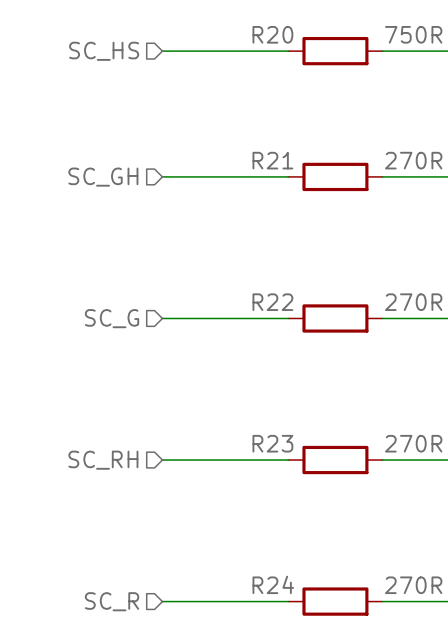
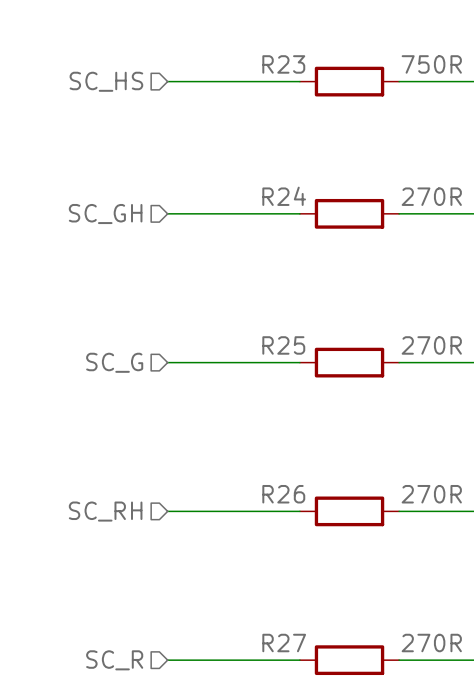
R20 name: R20 (272, 34) -> R23 (283, 64)
R21 name: R21 (272, 160) -> R24 (284, 196)
R22 name: R22 (272, 302) -> R25 (283, 345)
R23 name: R23 (272, 443) -> R26 (283, 494)
R24 name: R24 (273, 584) -> R27 (284, 643)

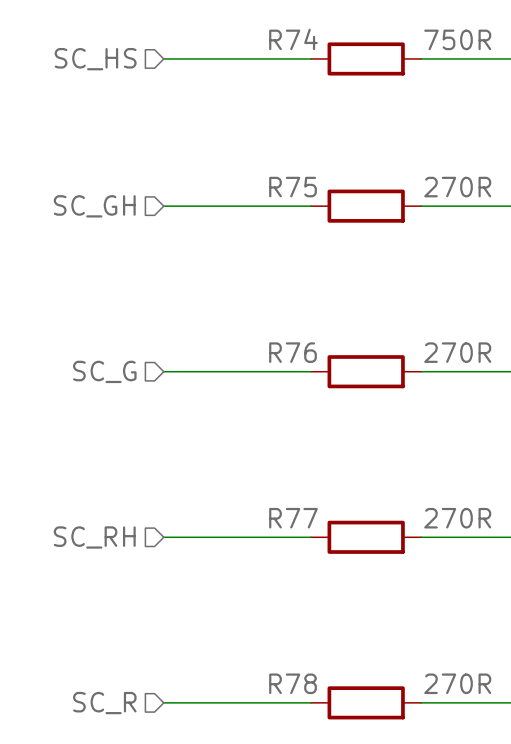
R23 name: R23 (283, 64) -> R74 (293, 39)
R24 name: R24 (284, 196) -> R75 (293, 187)
R25 name: R25 (283, 345) -> R76 (293, 352)
R26 name: R26 (283, 494) -> R77 (293, 518)
R27 name: R27 (284, 643) -> R78 (293, 683)

